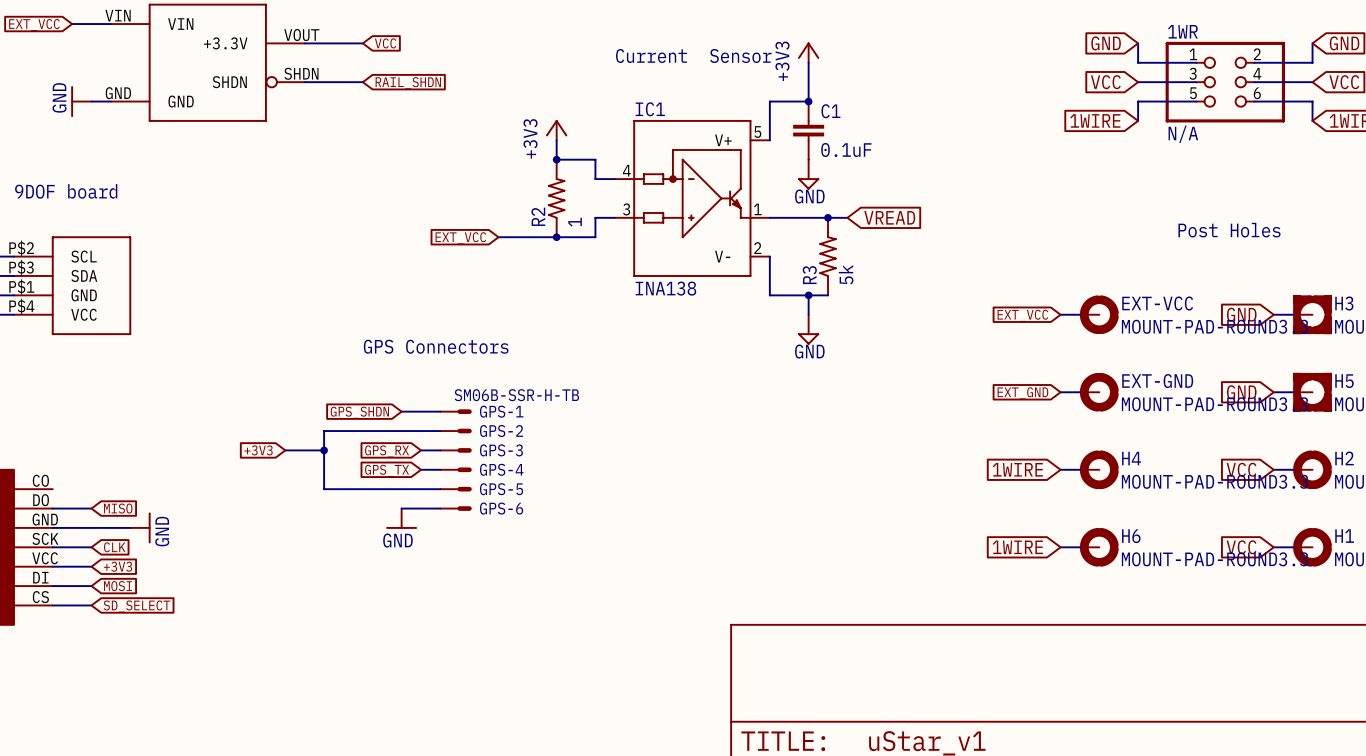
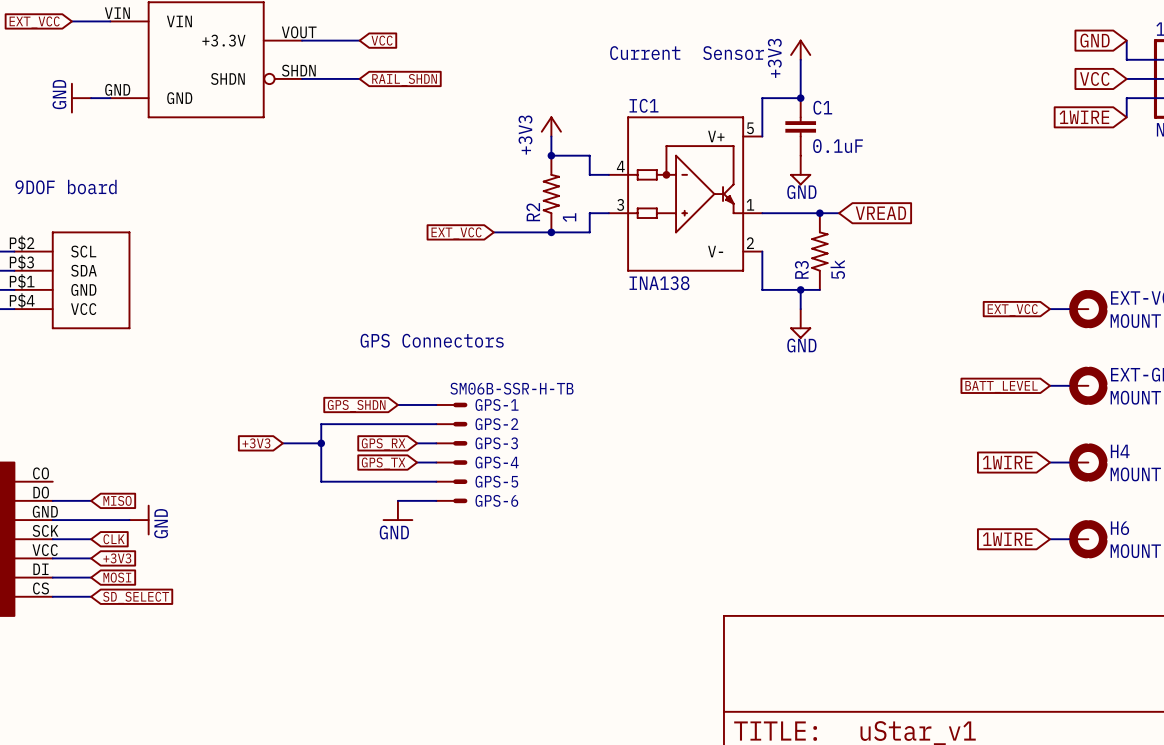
global label: EXT_GND (1022, 393) -> BATT_LEVEL (1001, 386)

